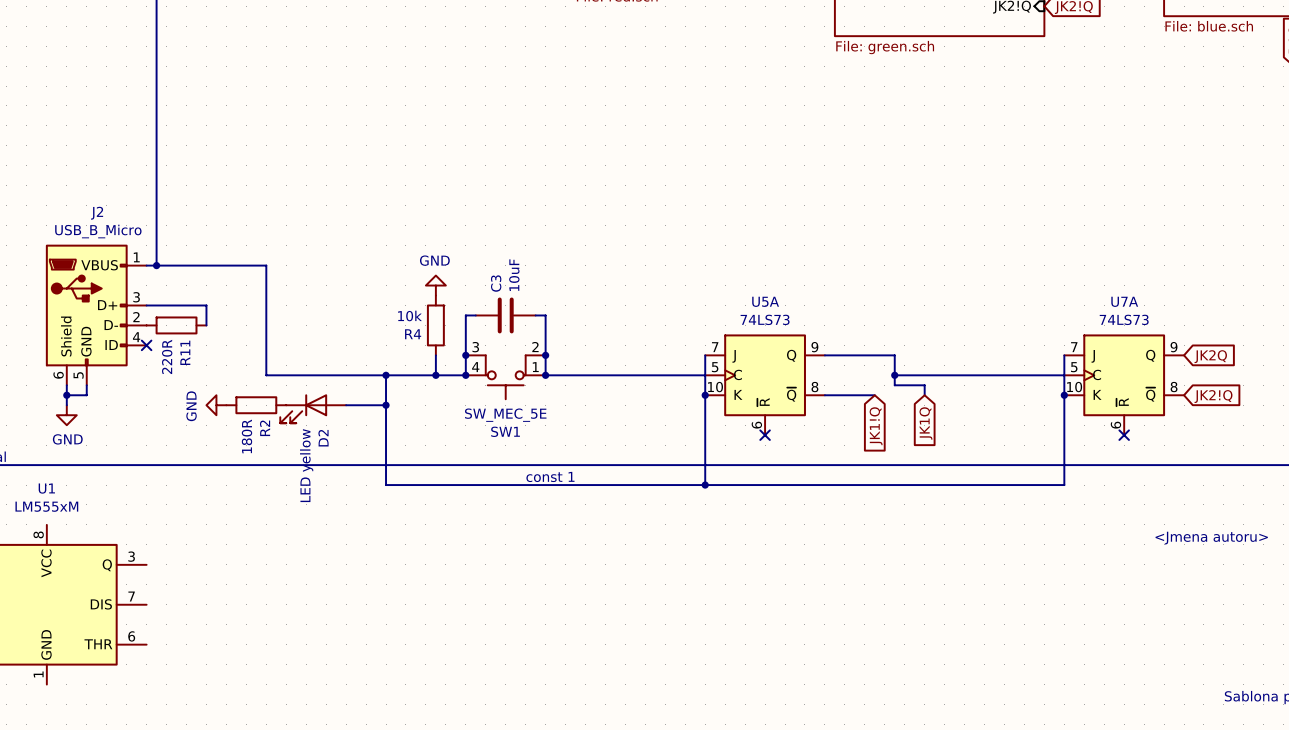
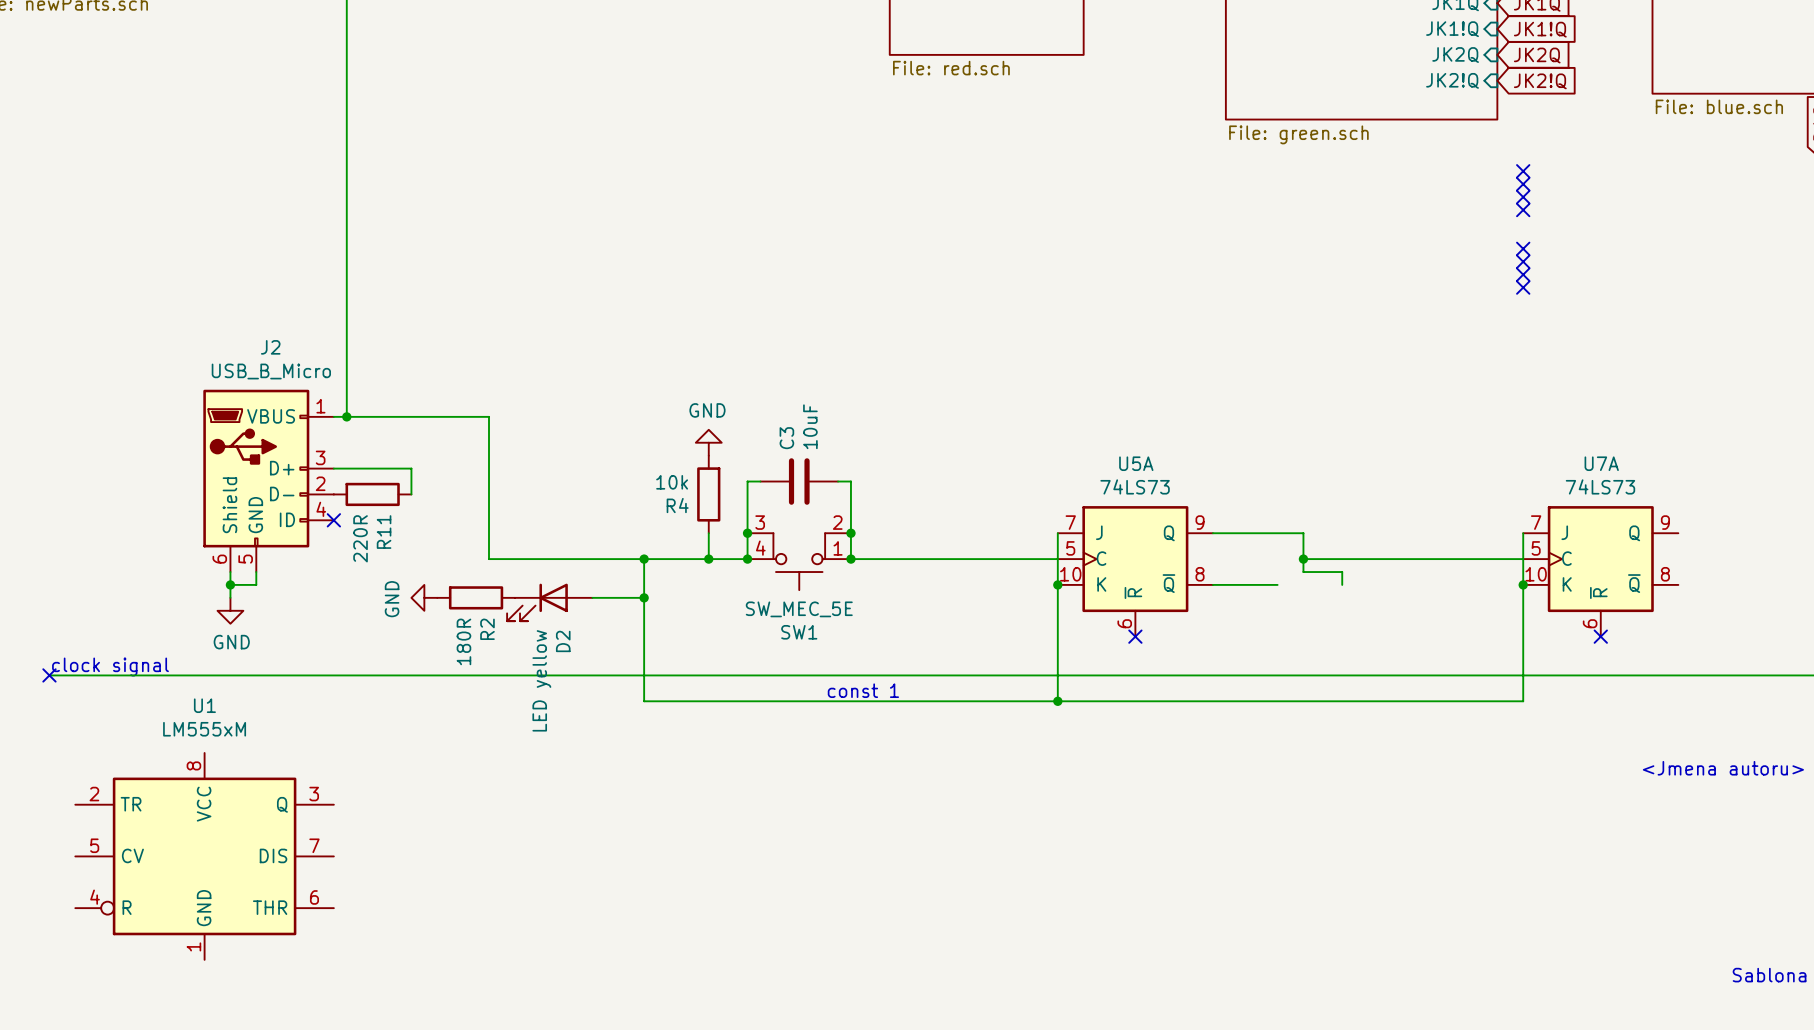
no-connect mark: none -> (1523, 171)
no-connect mark: none -> (1523, 184)
no-connect mark: none -> (1523, 197)
no-connect mark: none -> (1523, 210)
no-connect mark: none -> (1523, 248)
no-connect mark: none -> (1523, 261)
no-connect mark: none -> (1523, 274)
no-connect mark: none -> (1523, 287)
global label: JK2Q (1210, 356) -> none
global label: JK2!Q (1213, 396) -> none
global label: JK1Q (925, 423) -> none
global label: JK1!Q (876, 426) -> none

